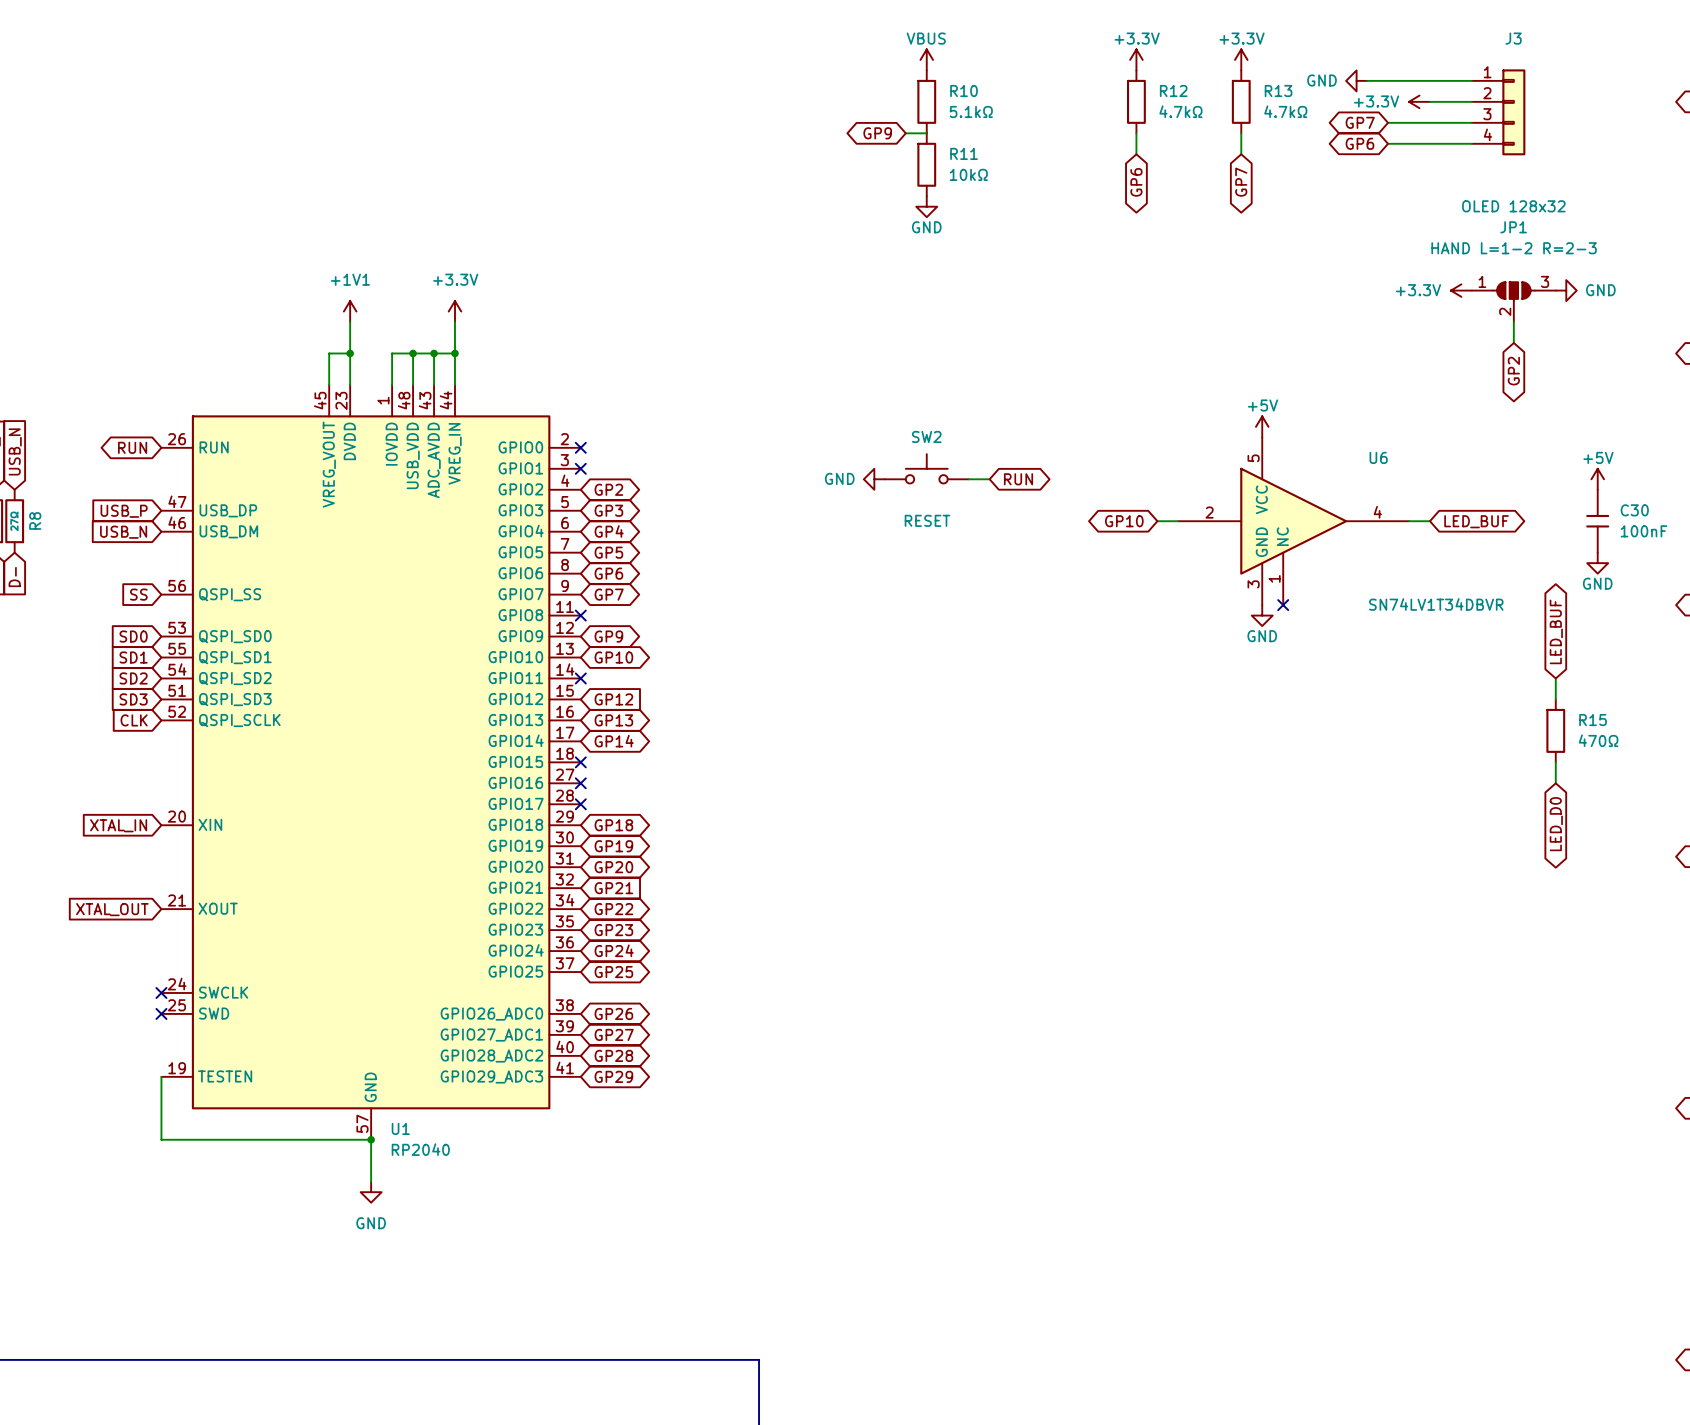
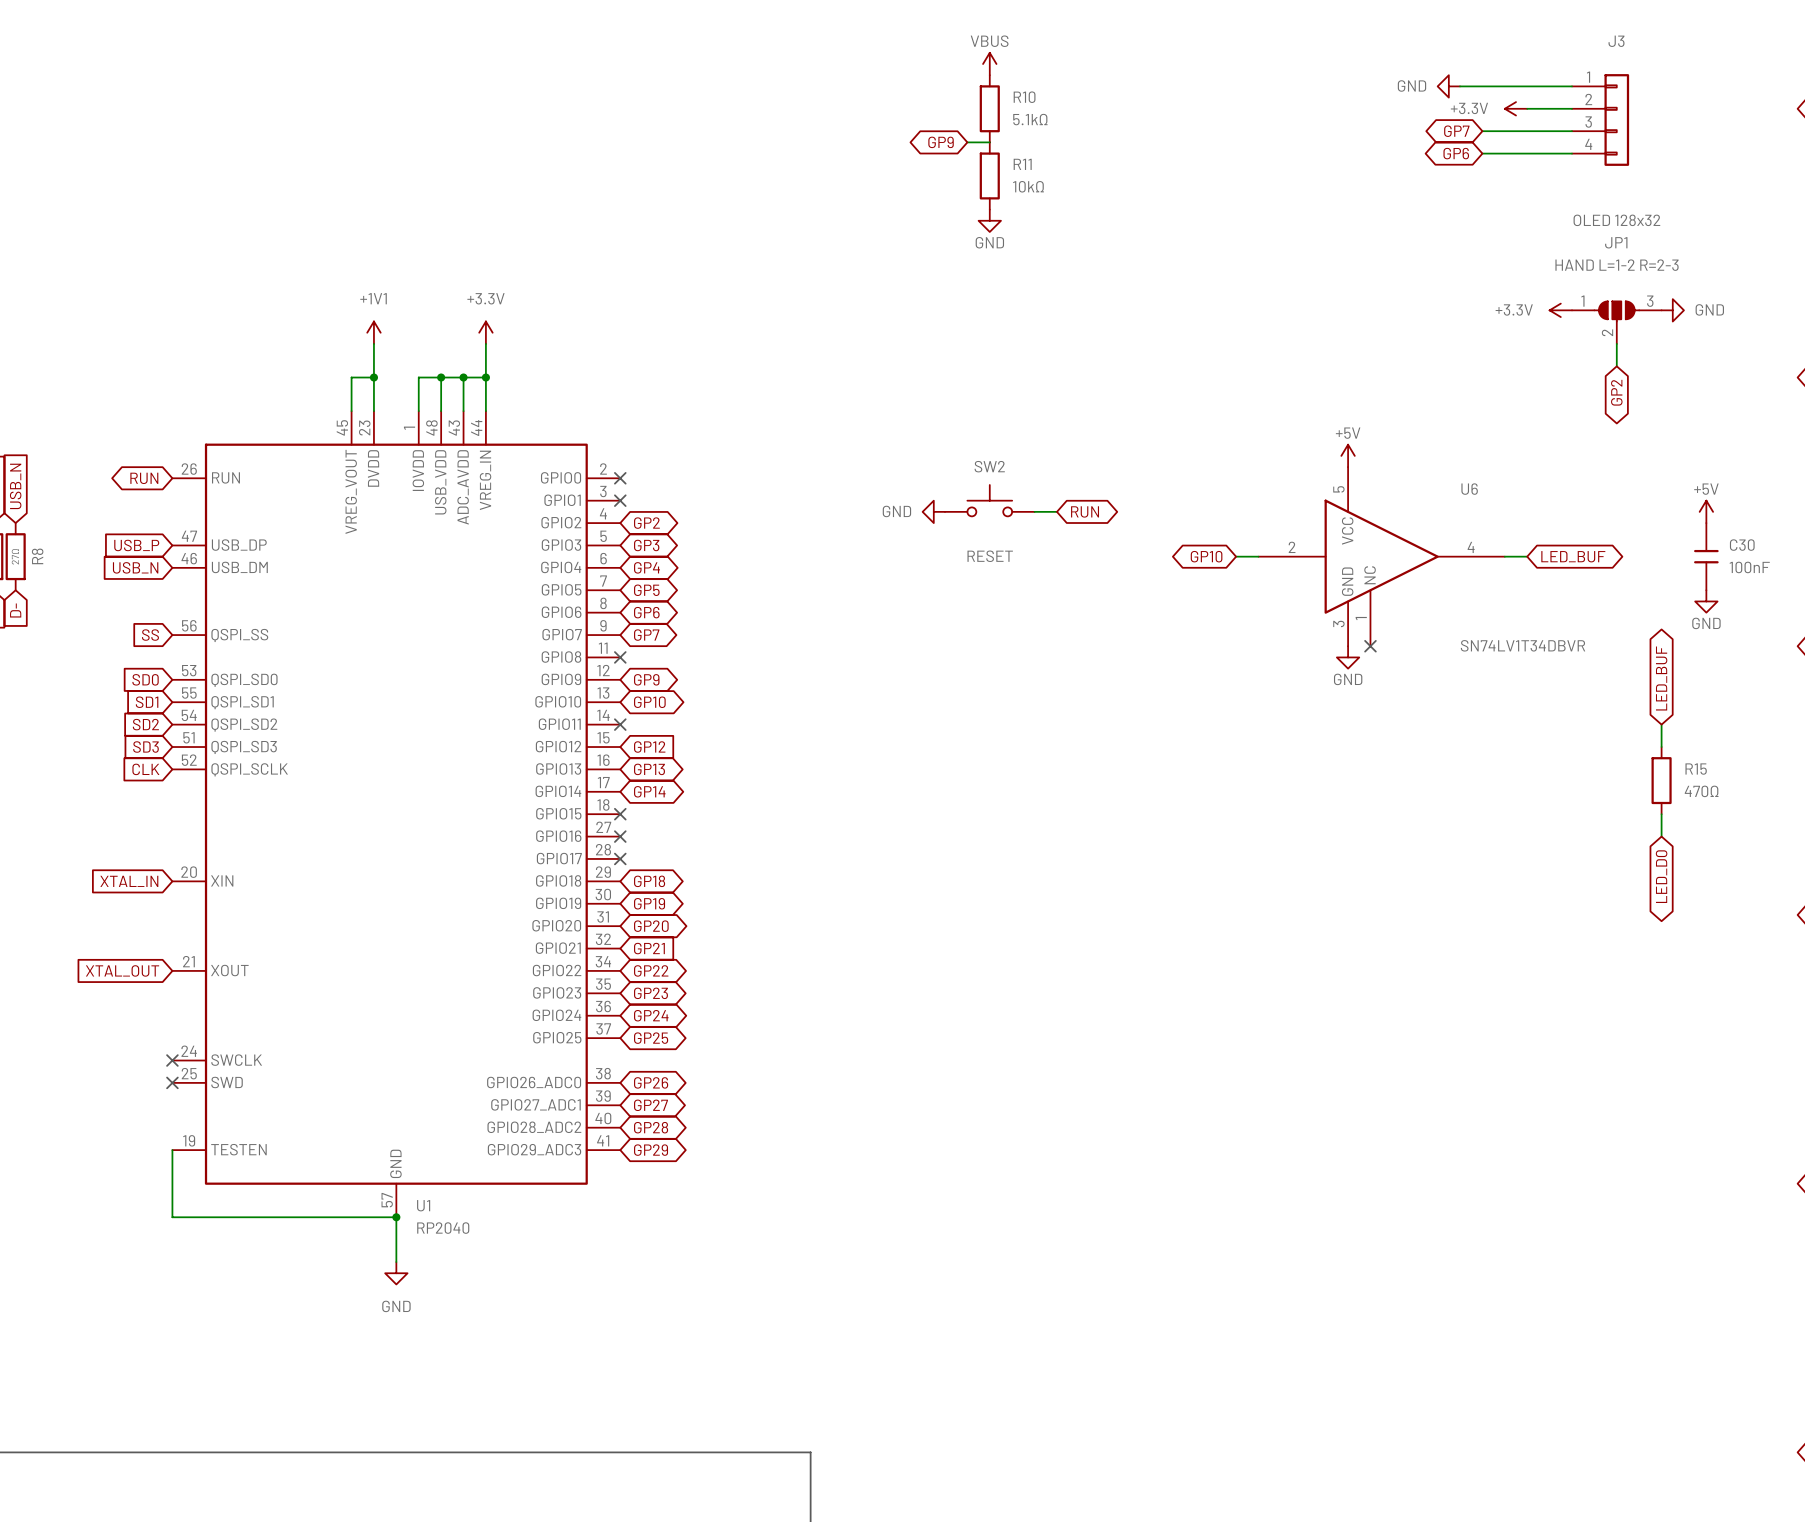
power symbol: +3.3V (1136, 59) -> none
power symbol: +3.3V (1241, 59) -> none
R12: 4.7kΩ (1136, 101) -> none
R13: 4.7kΩ (1241, 101) -> none
wire: (1136, 133) (1136, 154) -> none
wire: (1241, 133) (1241, 154) -> none
global label: GP6 (1136, 182) -> none
global label: GP7 (1241, 182) -> none

